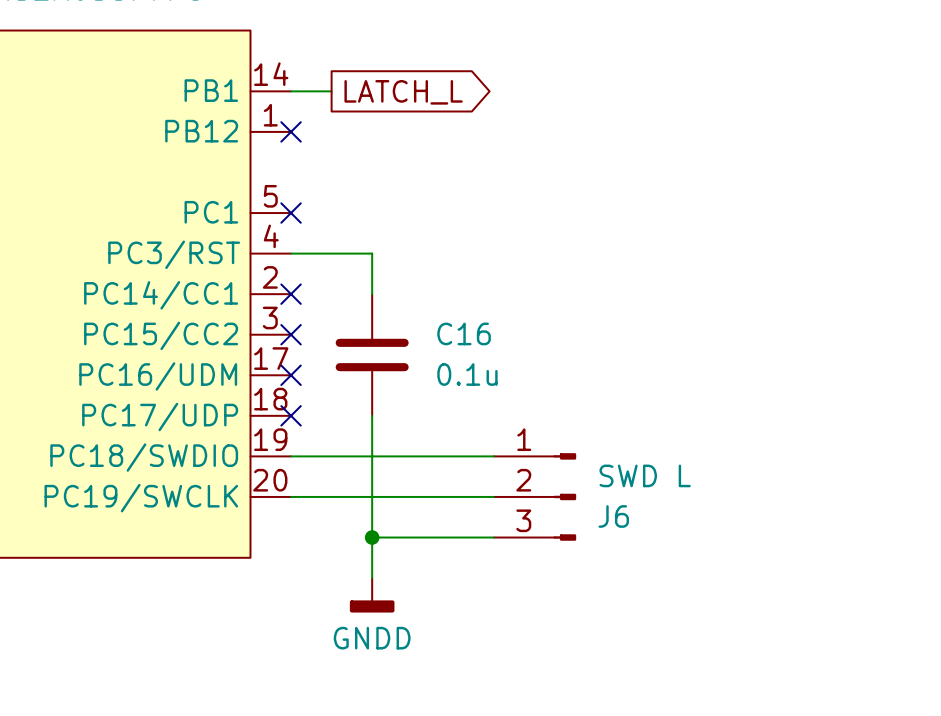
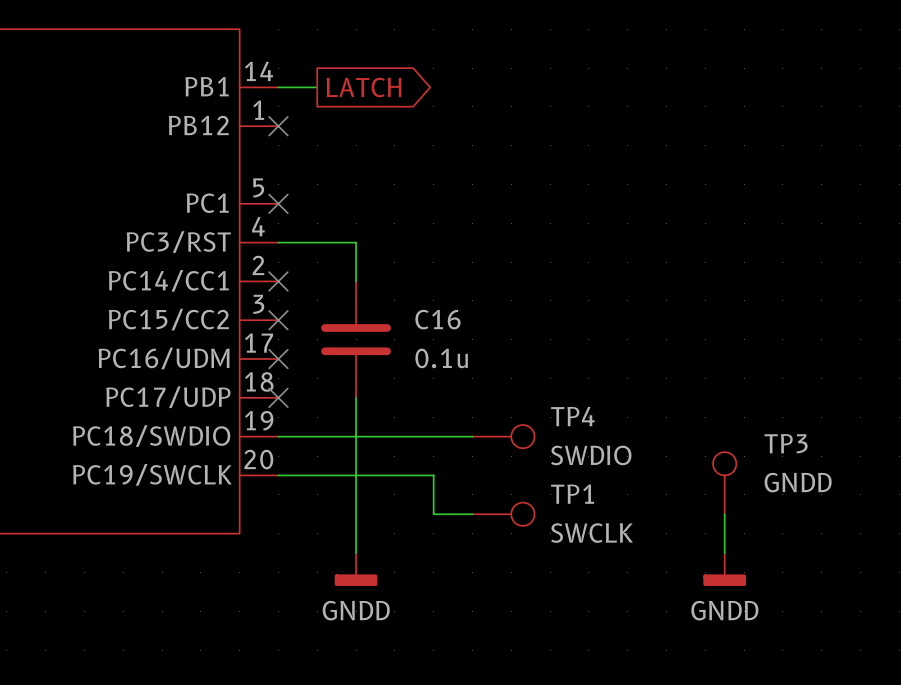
global label: LATCH_L (403, 92) -> LATCH (363, 87)
TP4: none -> SWDIO (503, 436)
wire: (453, 496) (493, 496) -> (433, 475) (433, 514)
J6: SWD L (535, 496) -> none
TP3: none -> GNDD (724, 483)
wire: (372, 537) (453, 537) -> none
junction: (372, 537) -> none
TP1: none -> SWCLK (503, 514)
wire: none -> (724, 514) (724, 553)
power symbol: none -> GNDD (724, 569)

